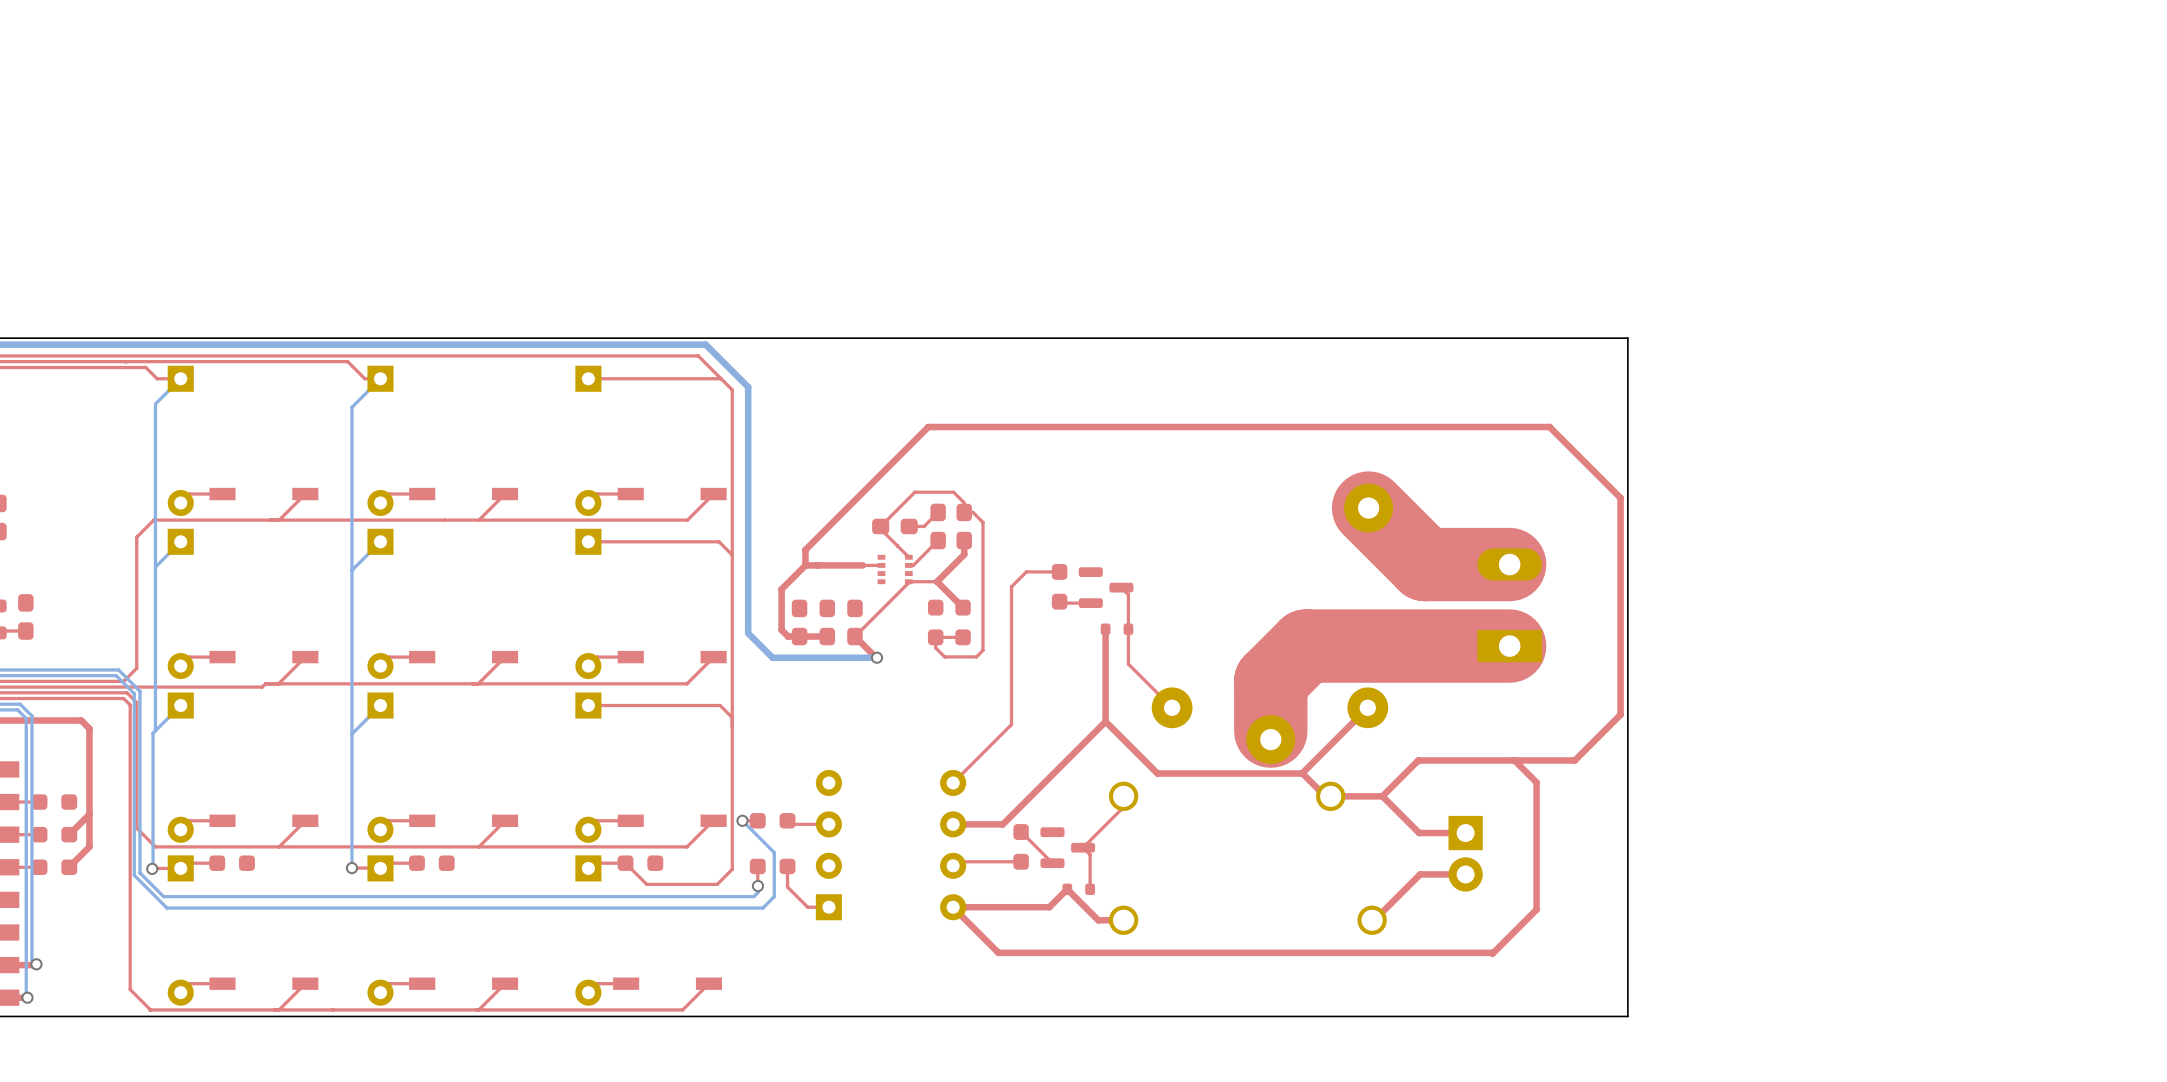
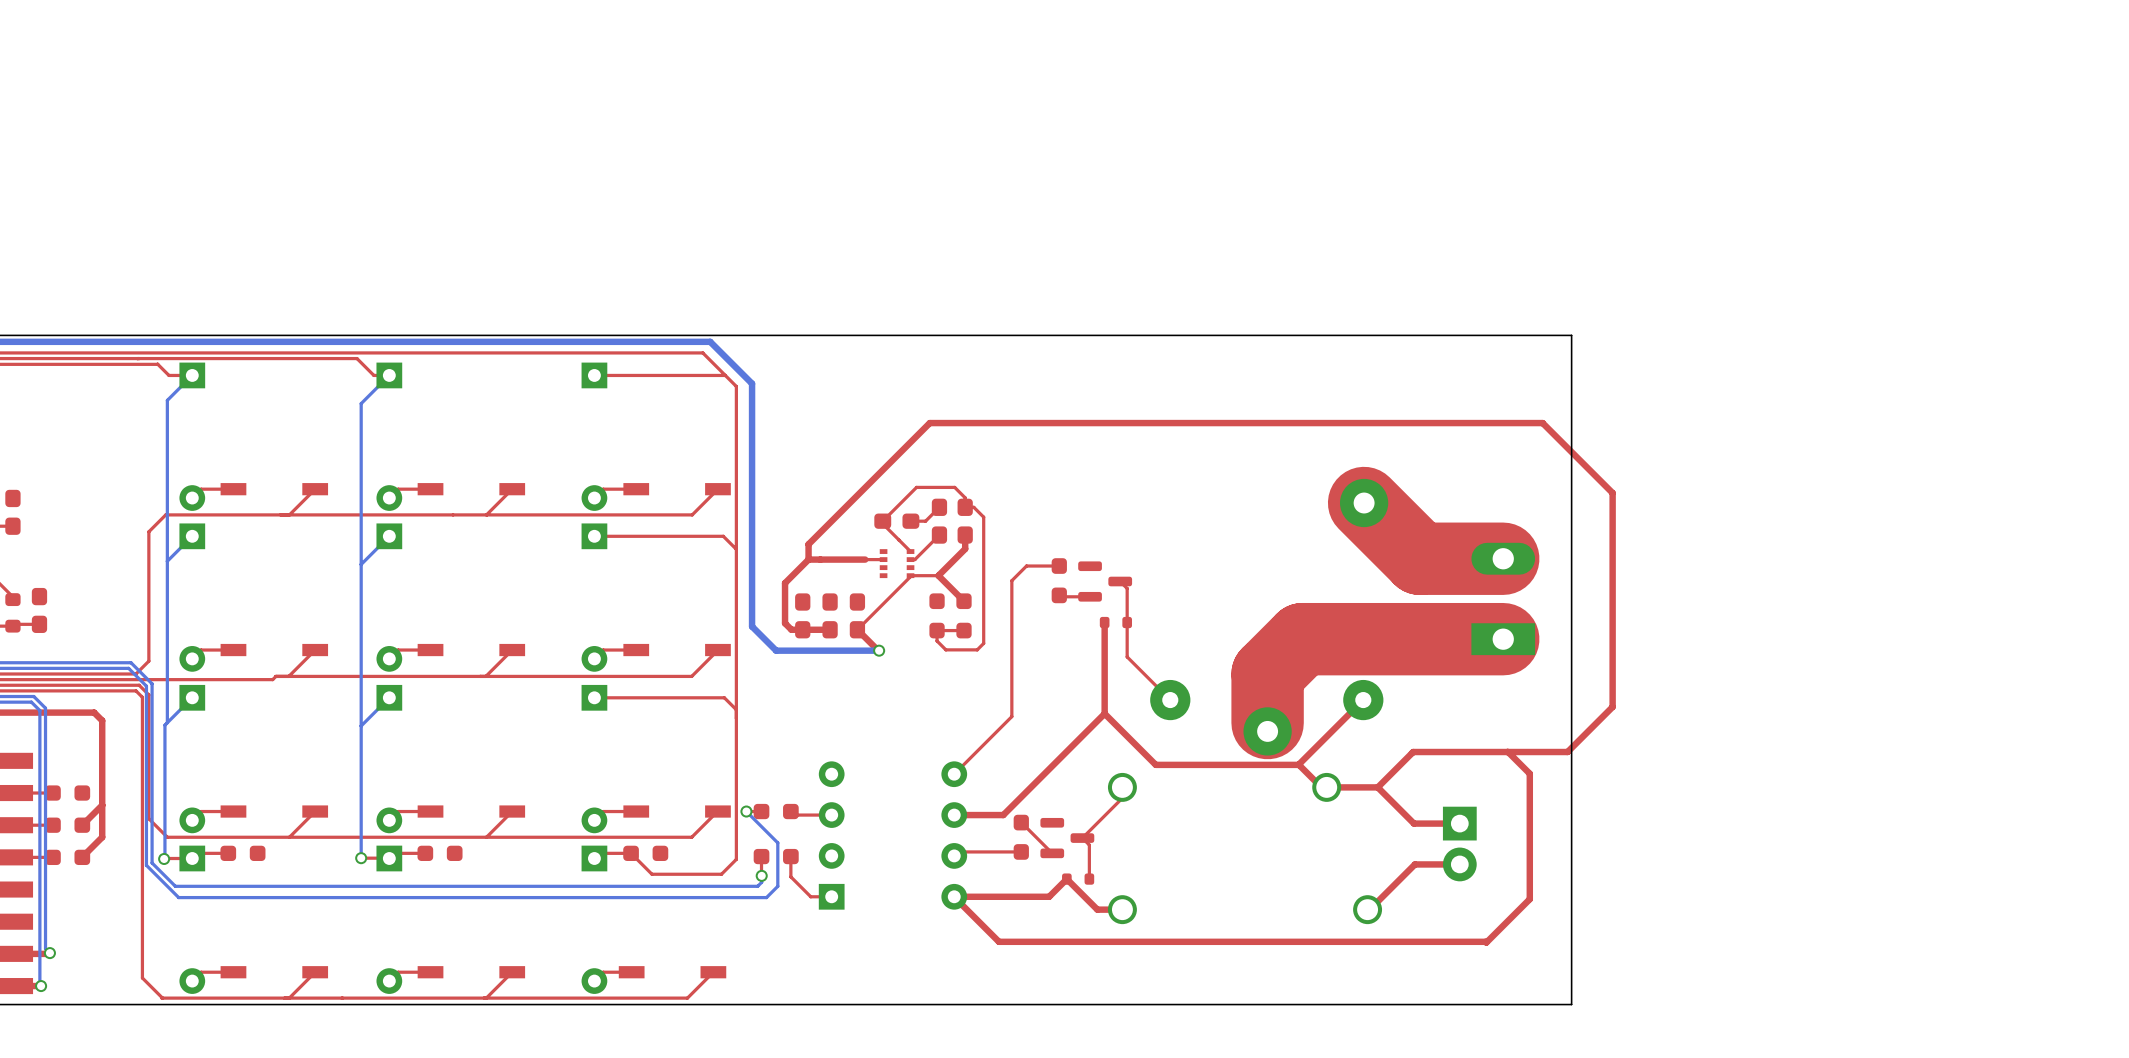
board edge: (1578, 338) (1627, 338) (1627, 1016) (1578, 1016) -> (1571, 335) (1571, 1004)

